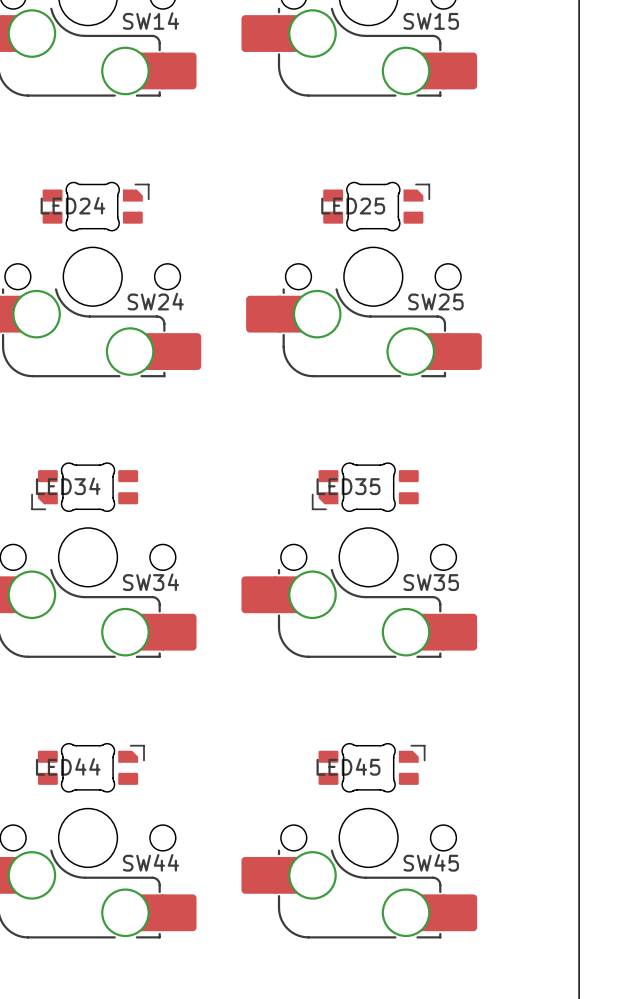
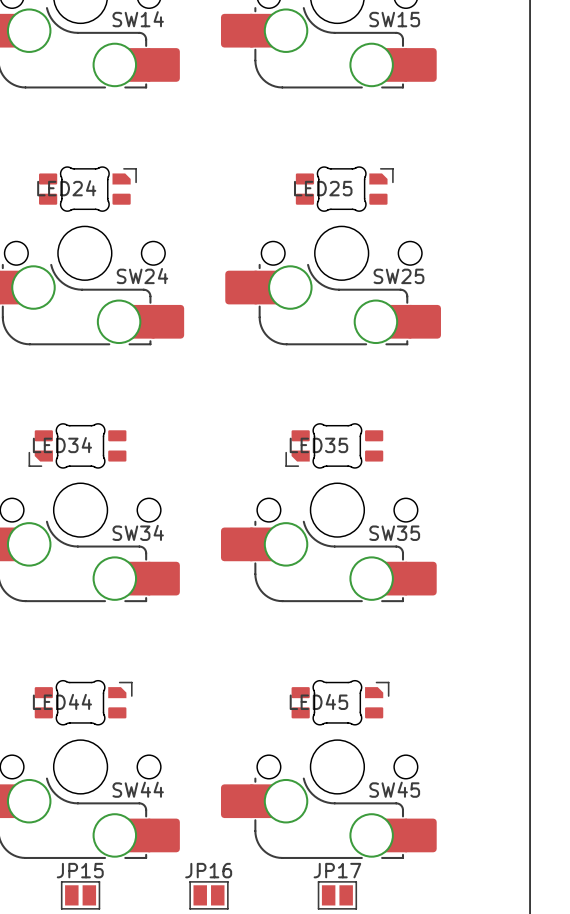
JP15: none -> (80, 895)
JP16: none -> (208, 895)
JP17: none -> (337, 895)

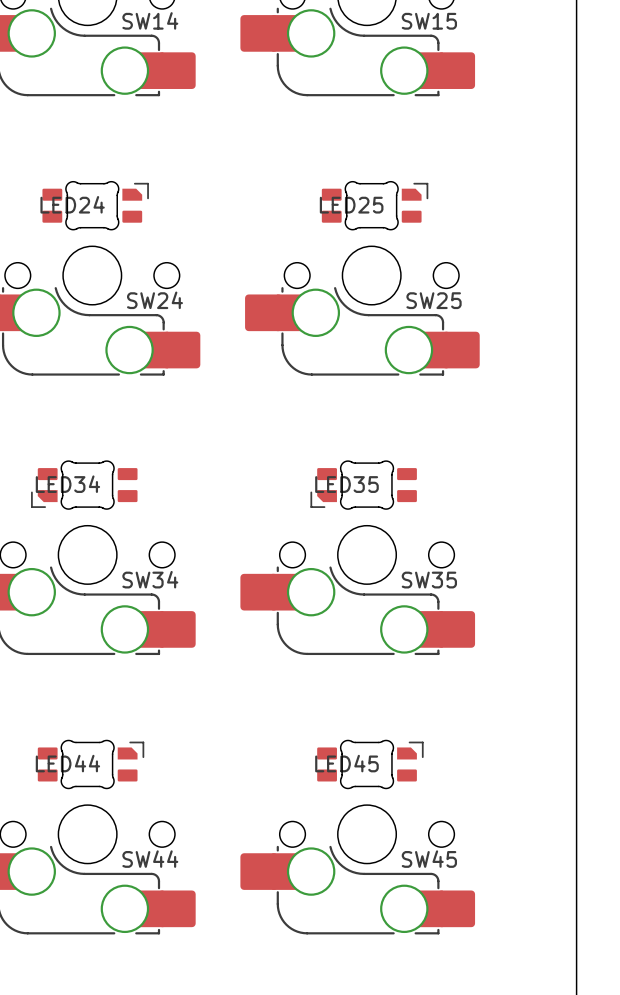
JP15: (80, 895) -> none
JP16: (208, 895) -> none
JP17: (337, 895) -> none

